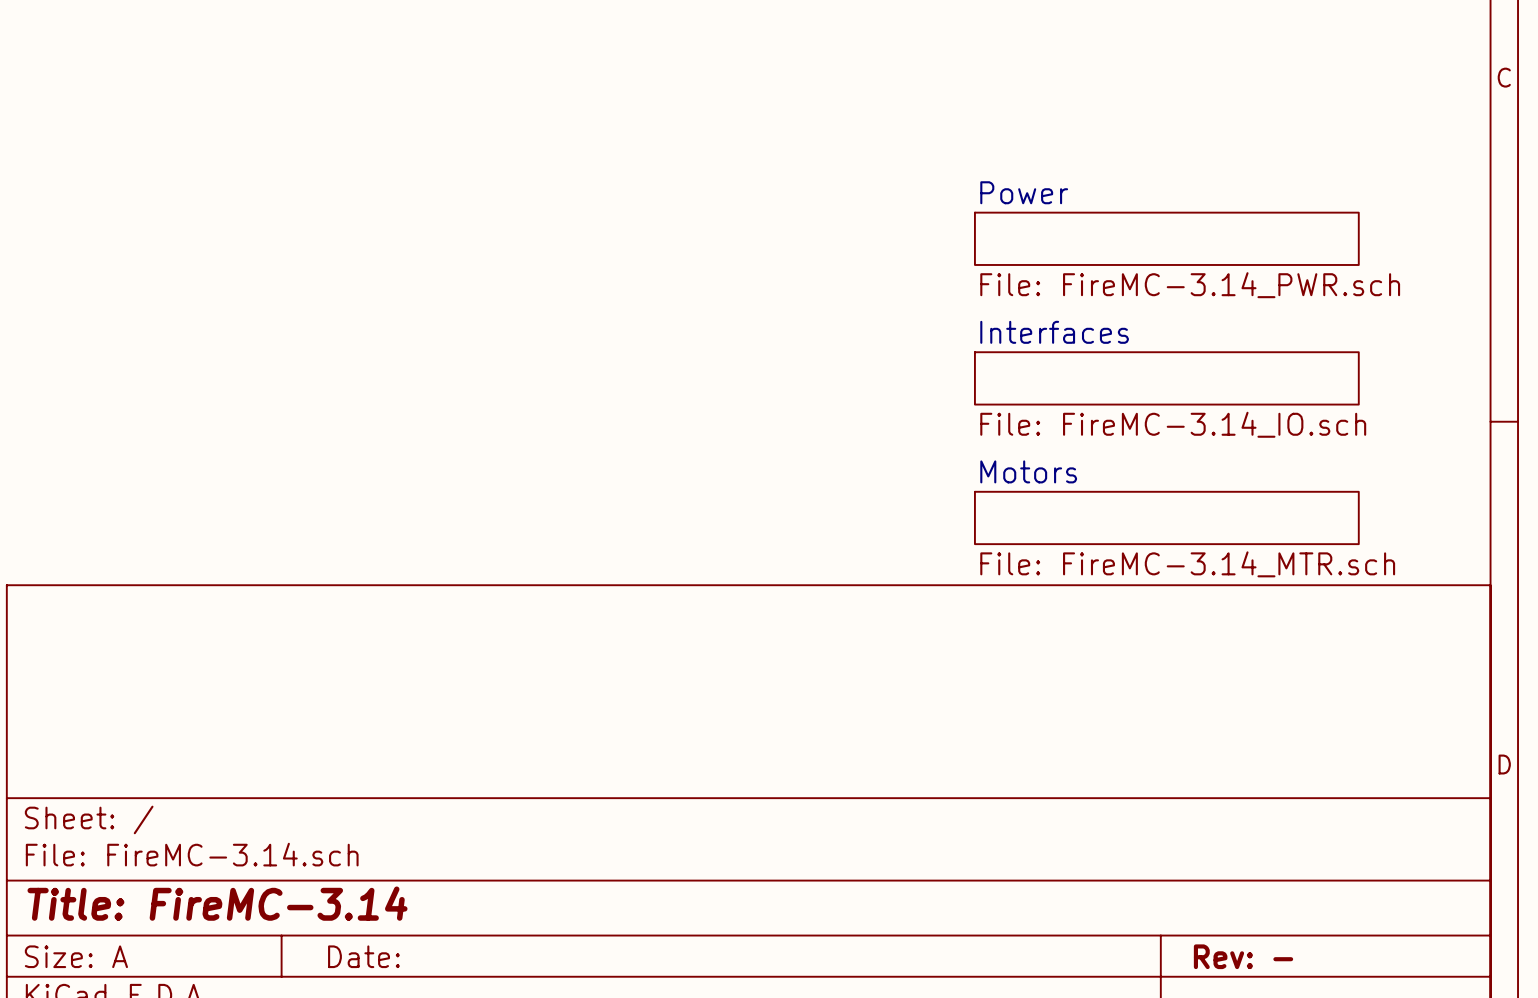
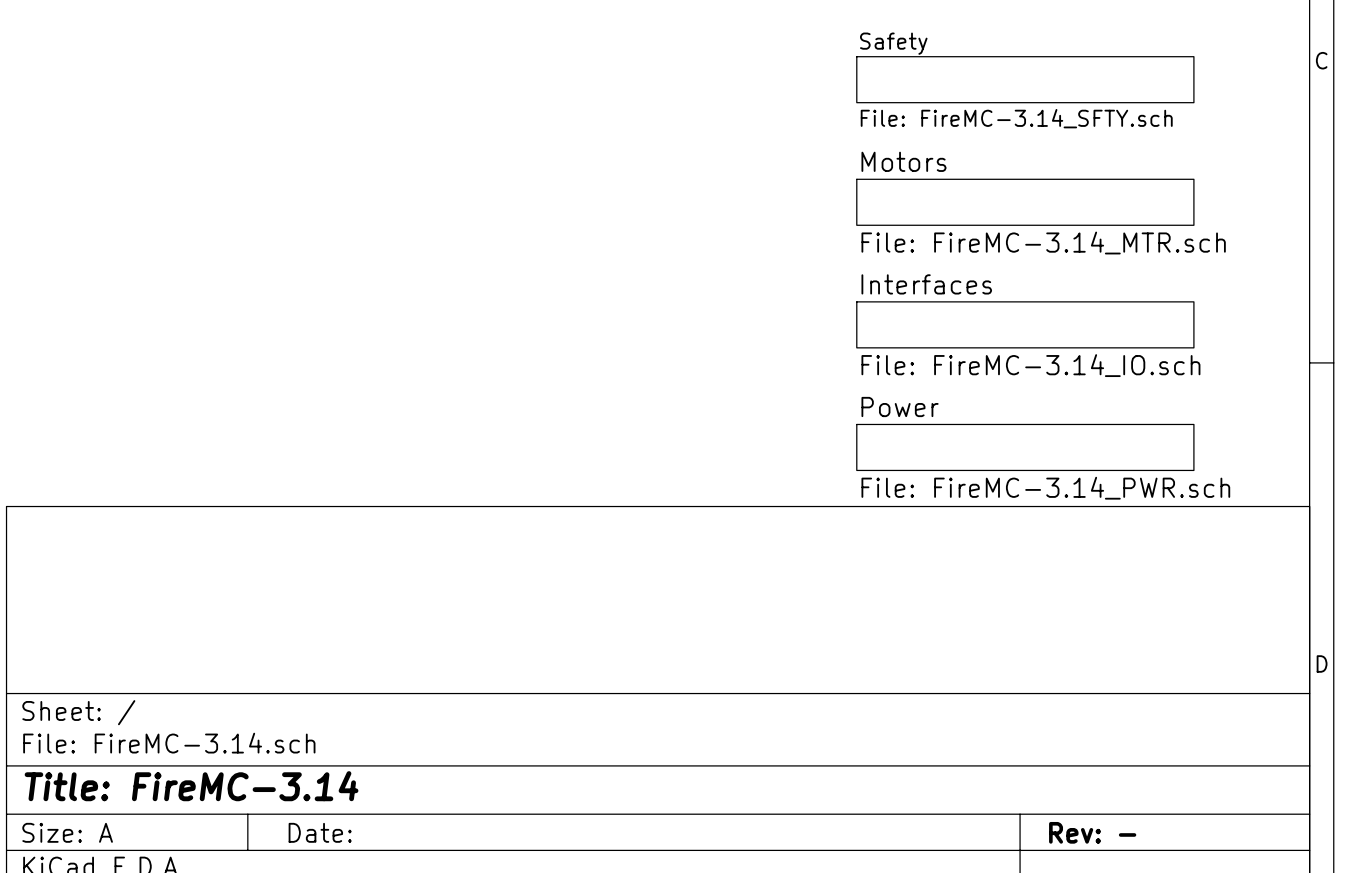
sheet Safety: none -> File: FireMC-3.14_SFTY.sch (1025, 79)
sheet Power name: Power (1024, 192) -> Motors (903, 161)
sheet Power value: File: FireMC-3.14_PWR.sch (1190, 285) -> File: FireMC-3.14_MTR.sch (1043, 243)
sheet Motors name: Motors (1028, 471) -> Power (900, 406)
sheet Motors value: File: FireMC-3.14_MTR.sch (1187, 564) -> File: FireMC-3.14_PWR.sch (1045, 488)

